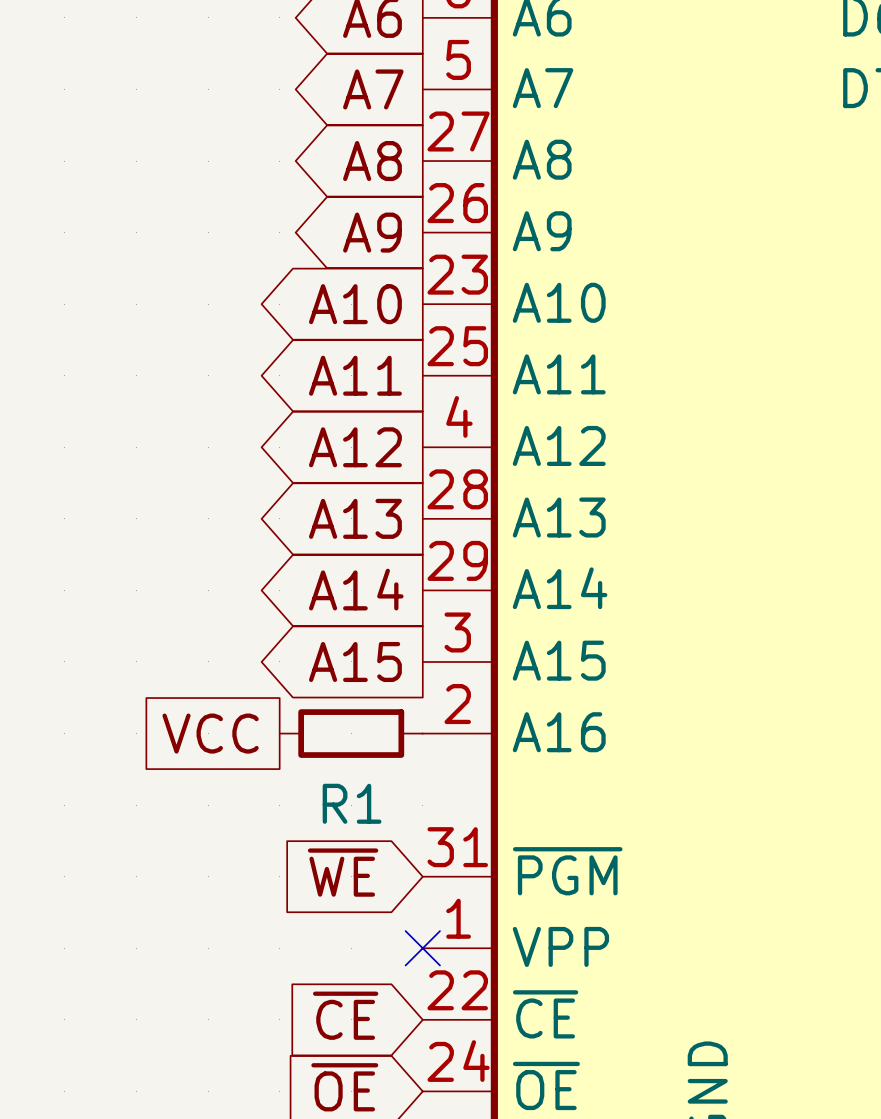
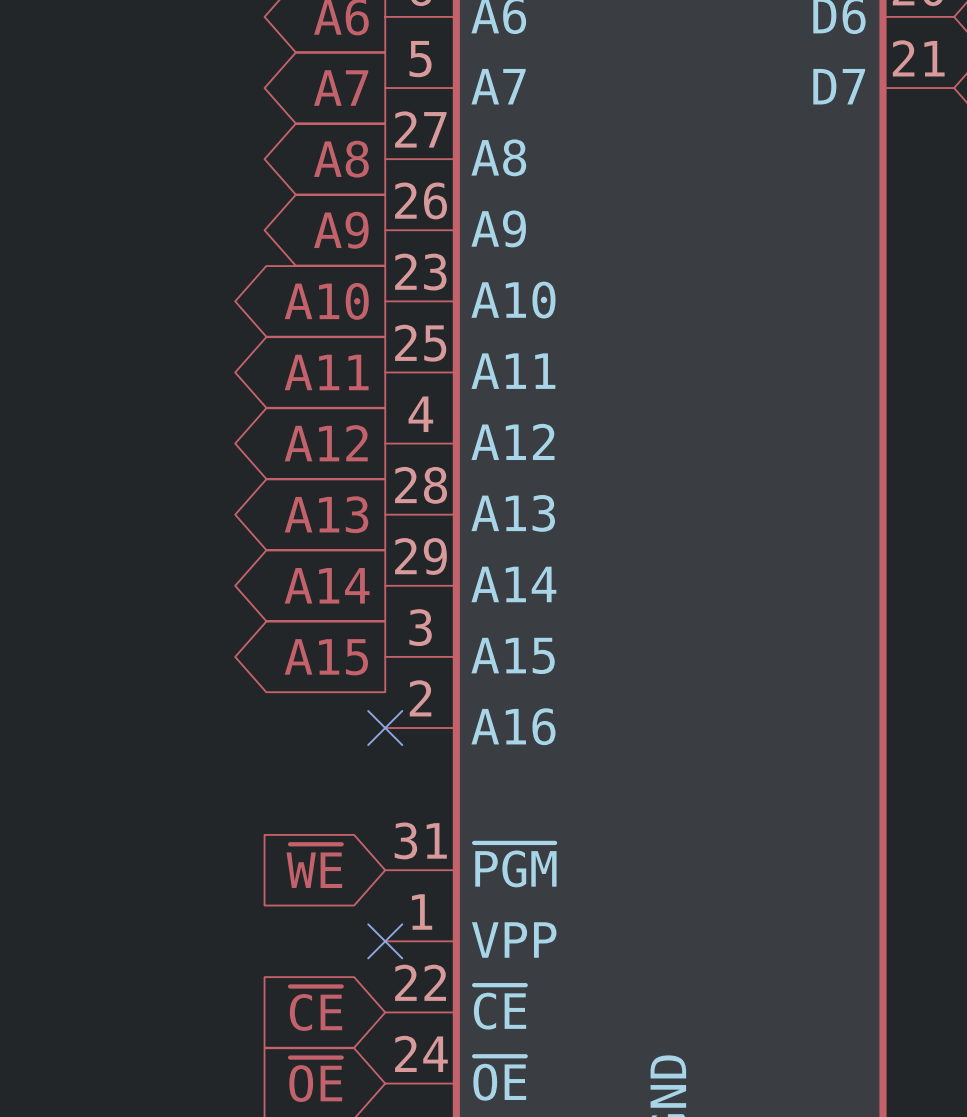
global label: VCC (210, 733) -> none
R1: (351, 733) -> none
no-connect mark: none -> (385, 728)

